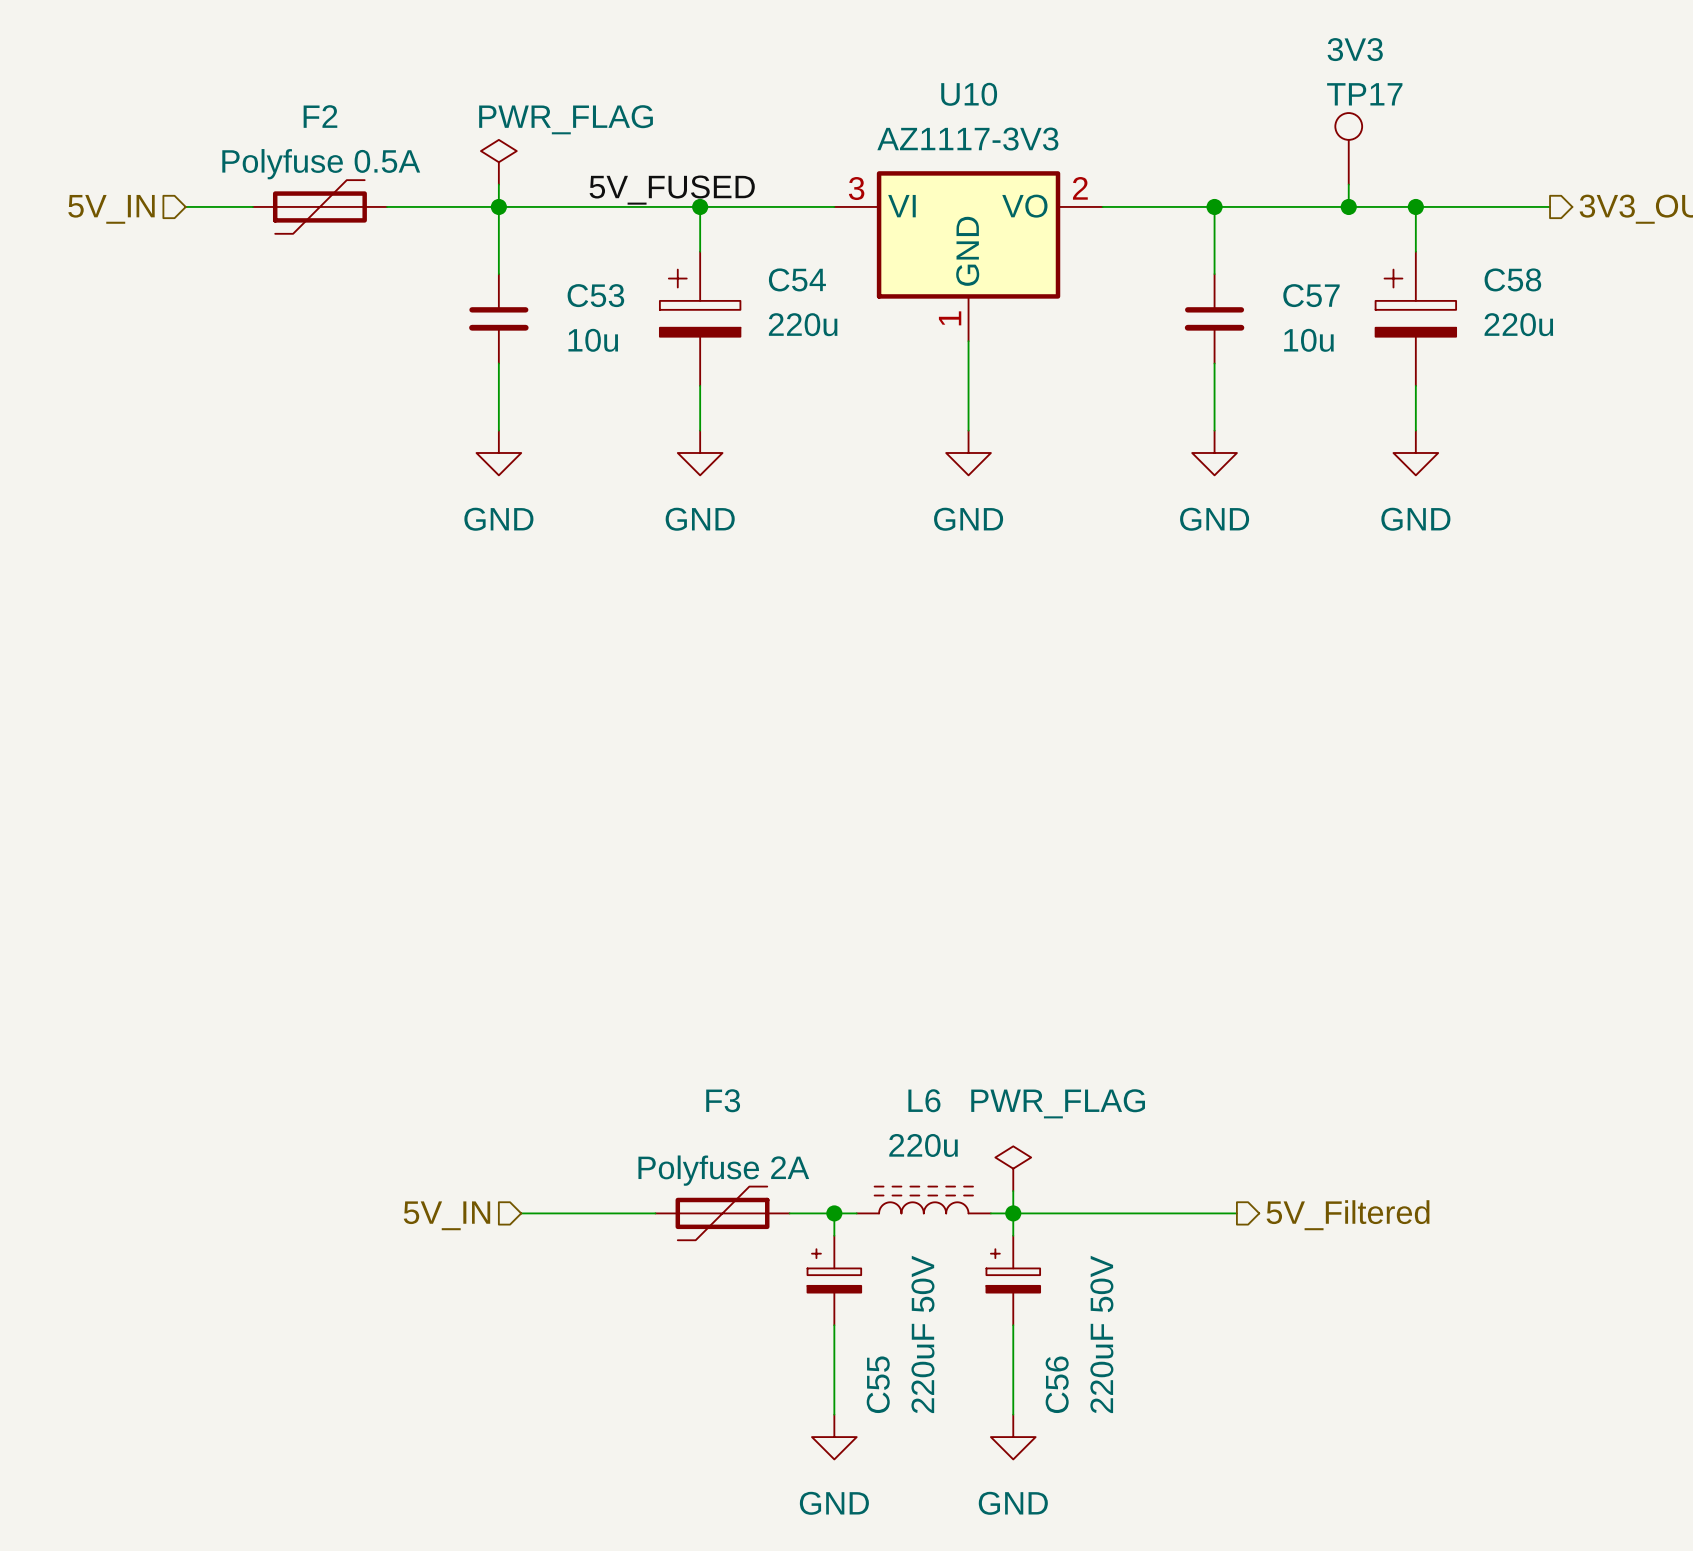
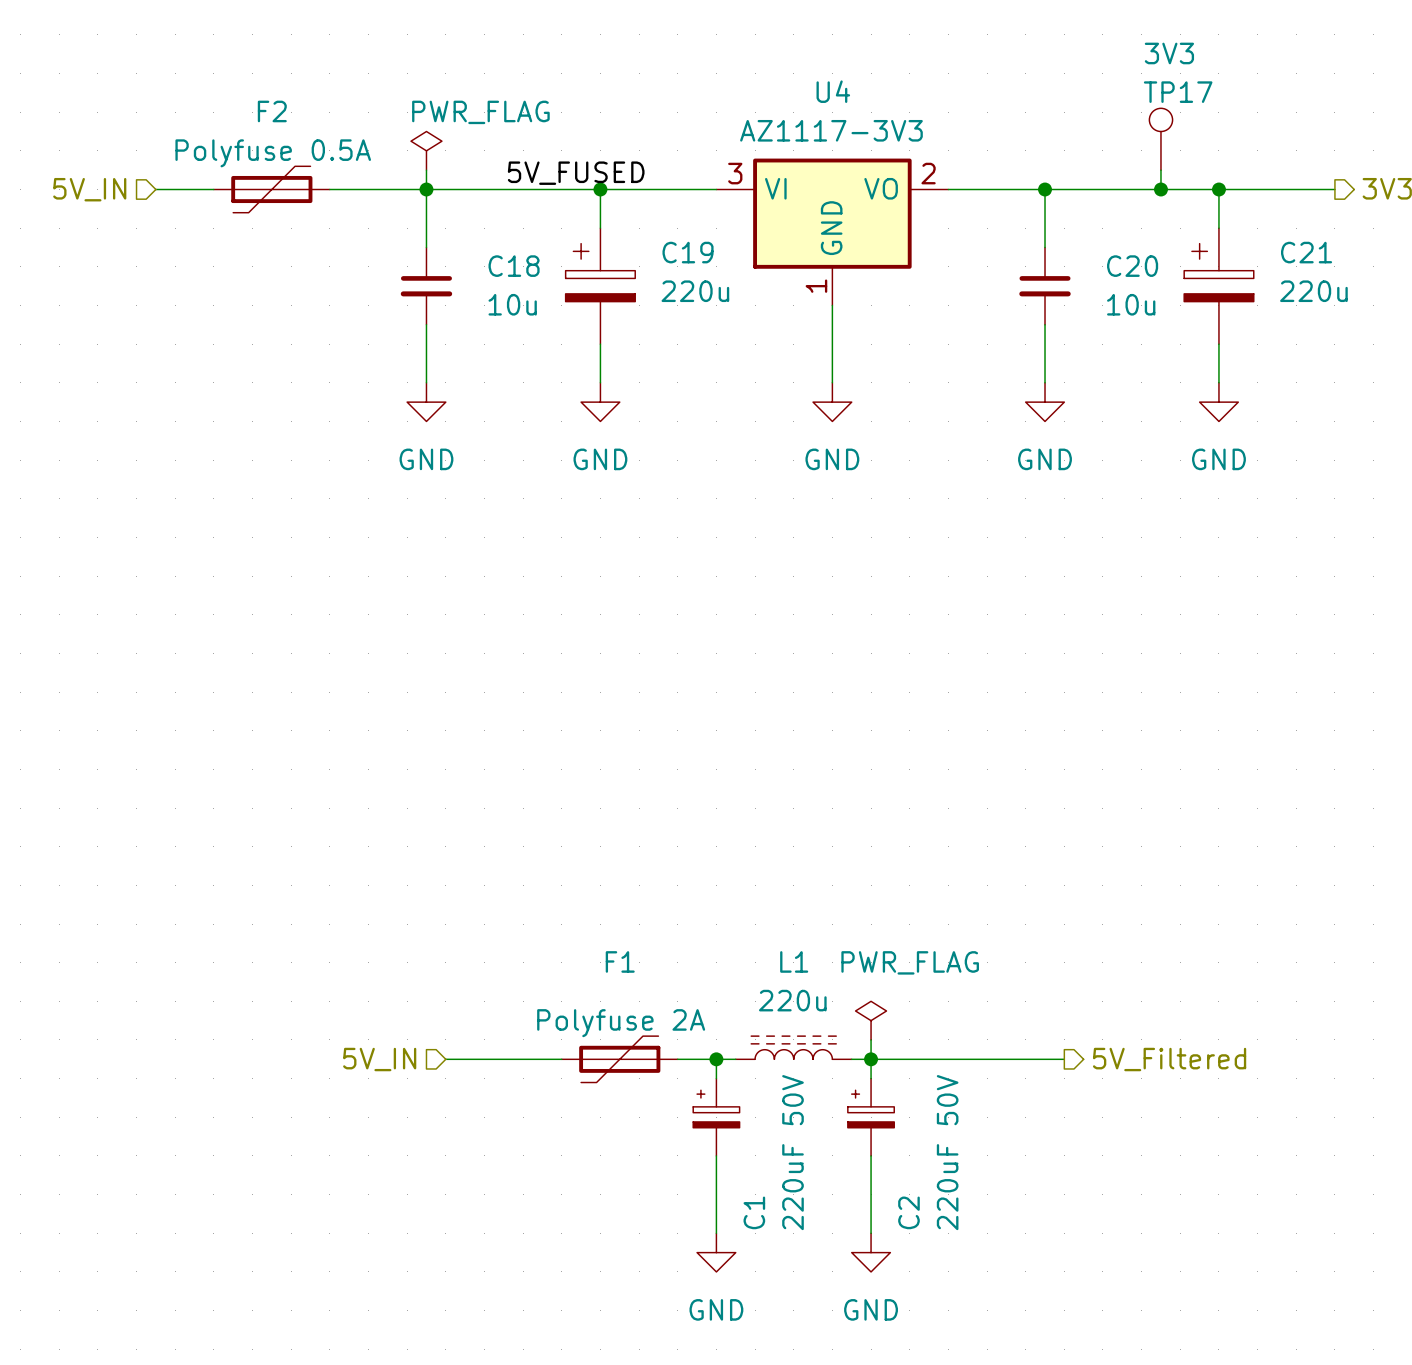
U10 name: U10 (969, 94) -> U4 (833, 91)
C54 name: C54 (797, 279) -> C19 (688, 252)
C58 name: C58 (1512, 279) -> C21 (1306, 252)
C53 name: C53 (595, 295) -> C18 (514, 266)
C57 name: C57 (1311, 295) -> C20 (1132, 266)
F3 name: F3 (723, 1100) -> F1 (620, 961)
L6 name: L6 (924, 1100) -> L1 (794, 961)
C55 name: C55 (878, 1384) -> C1 (754, 1212)
C56 name: C56 (1057, 1384) -> C2 (908, 1212)

